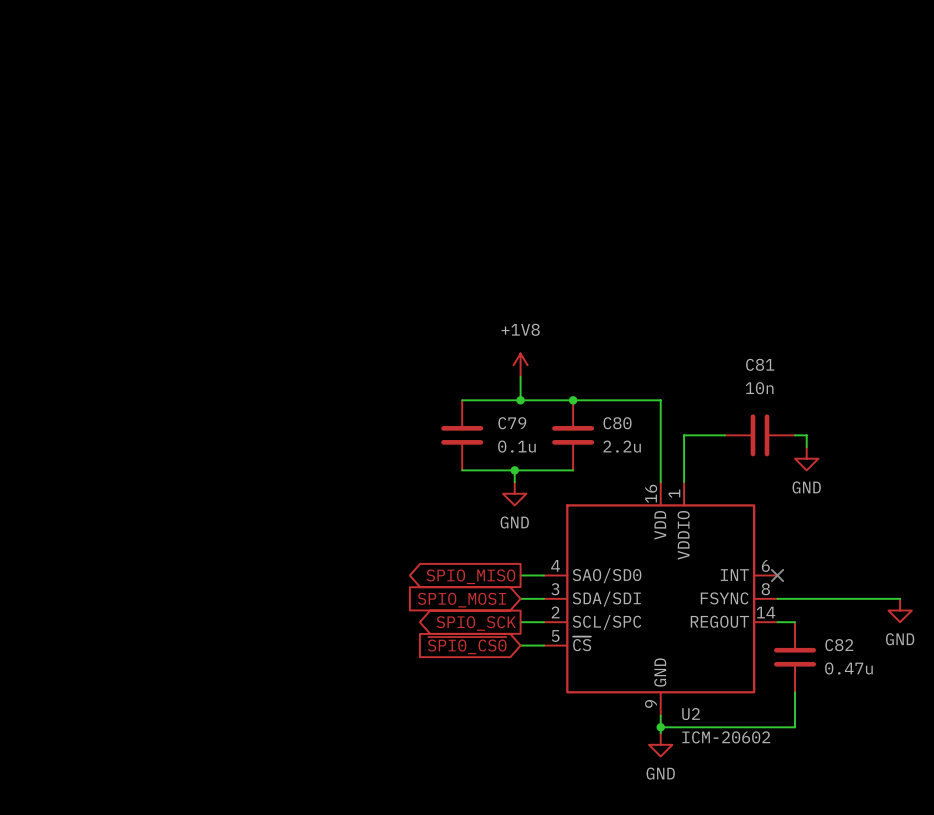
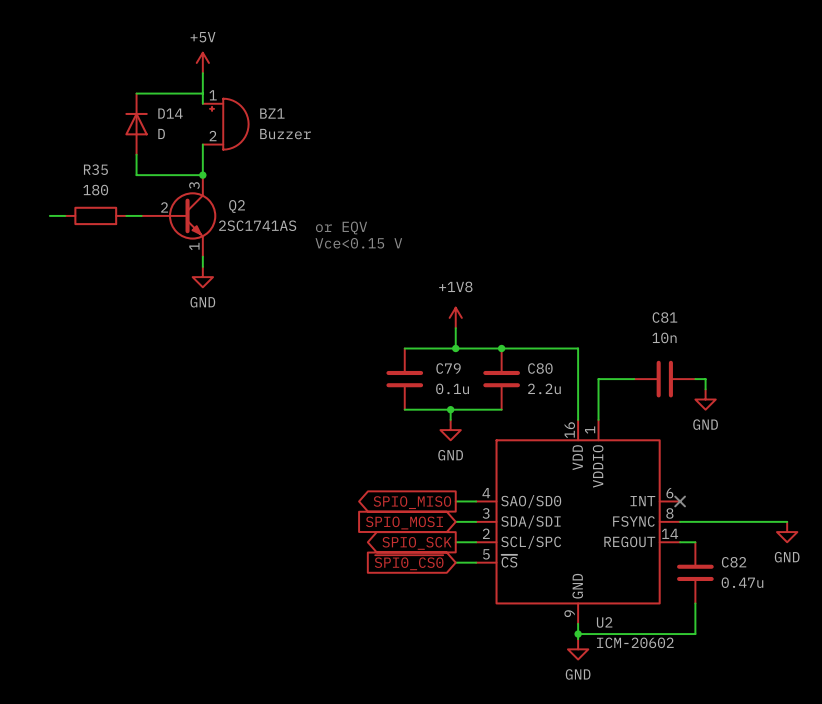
power symbol: none -> +5V (202, 62)
wire: none -> (202, 73) (202, 103)
wire: none -> (136, 93) (202, 93)
D14: none -> D (136, 124)
BZ1: none -> Buzzer (225, 124)
wire: none -> (202, 144) (202, 175) (136, 175) (136, 154)
junction: none -> (202, 175)
wire: none -> (49, 215) (65, 215)
R35: none -> 180 (95, 215)
wire: none -> (126, 215) (141, 215)
Q2: none -> 2SC1741AS (178, 215)
text: none -> or EQV (341, 227)
text: none -> Vce<0.15 V (358, 243)
wire: none -> (202, 256) (202, 266)
power symbol: none -> GND (202, 277)

